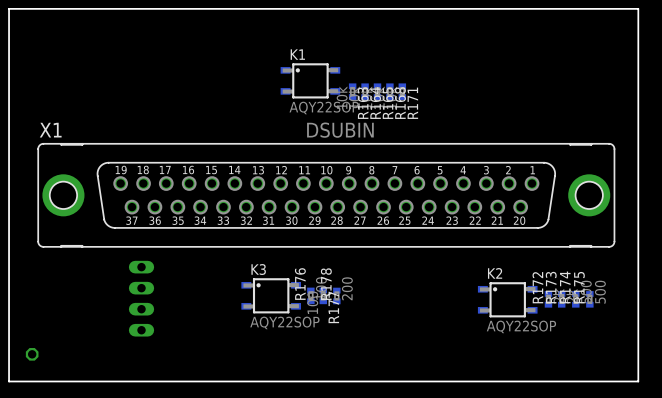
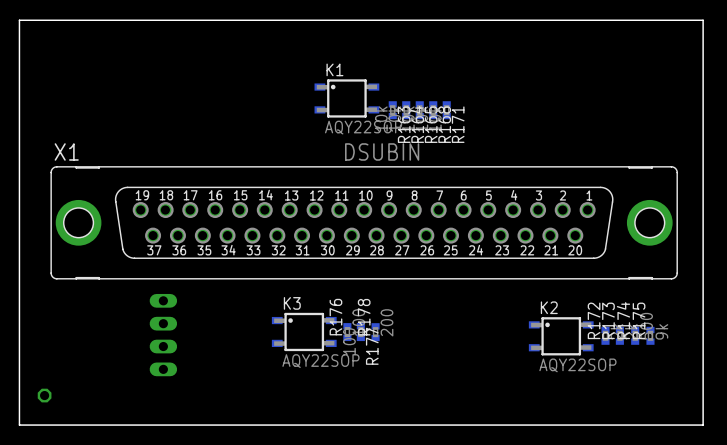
R175 value: 500 (600, 292) -> 9k (661, 331)

